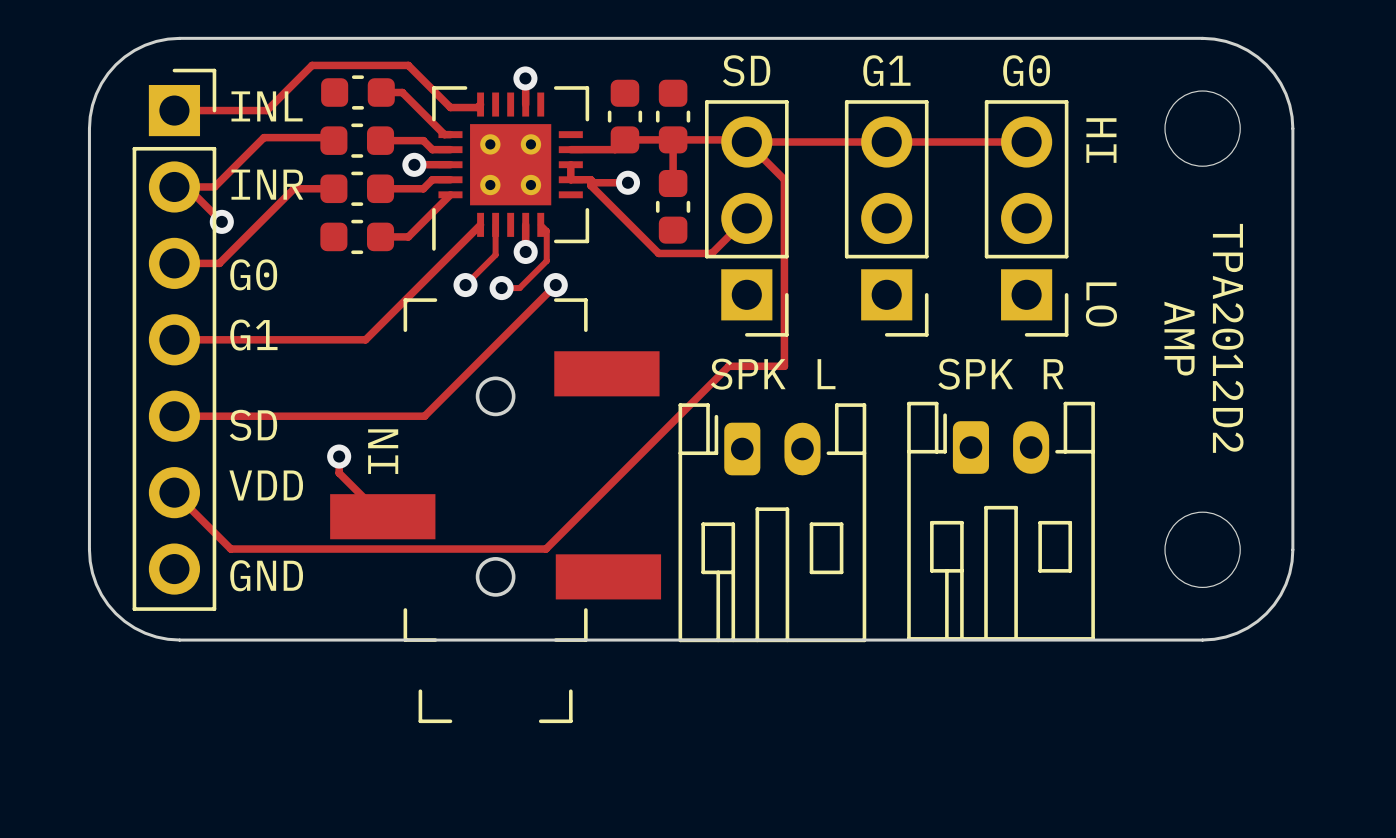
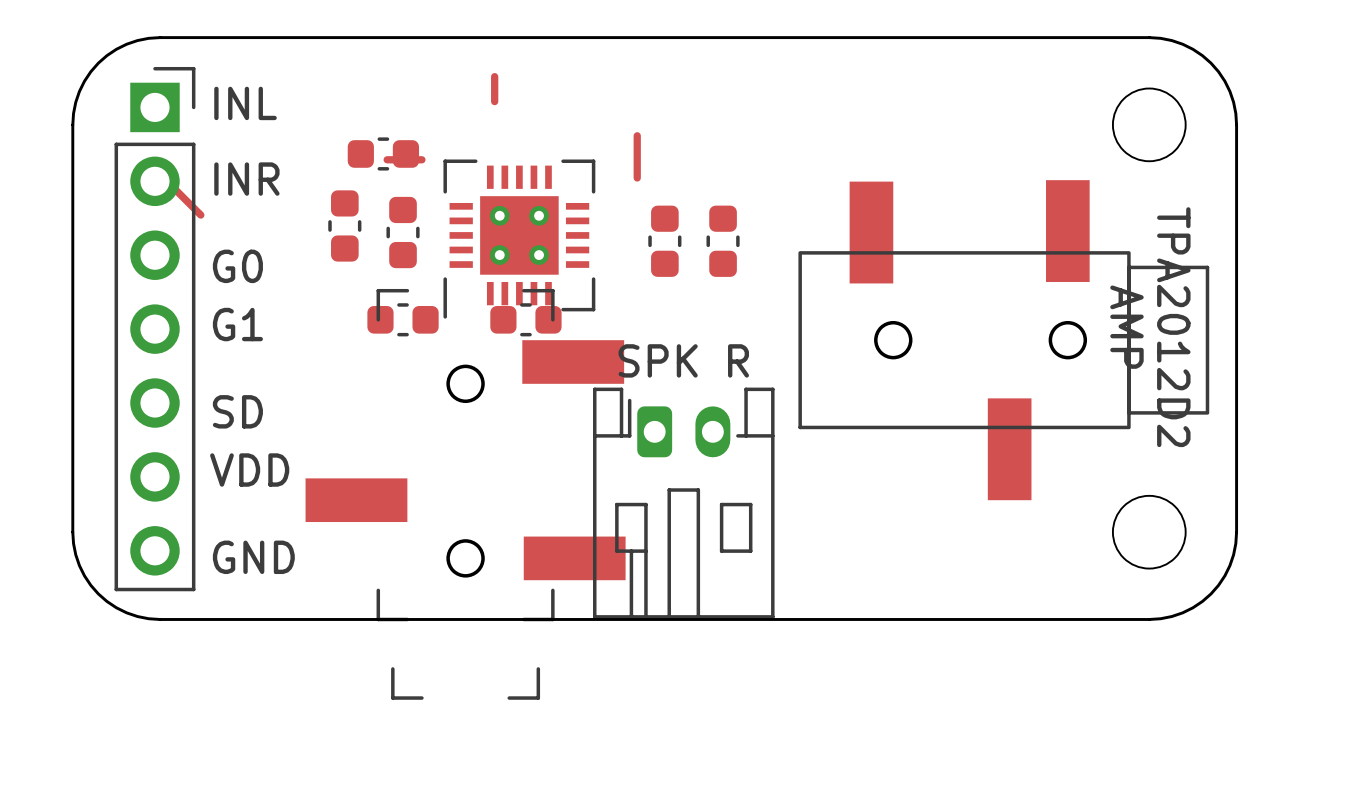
via: (525, 78) -> none
part: (357, 92) -> none
track: (381, 92) (402, 92) (444, 134) (450, 134) -> none
track: (480, 104) (477, 107) (450, 107) (408, 65) (312, 65) (266, 110) (174, 110) -> none
part: (624, 116) -> none
part: (673, 116) -> none
track: (333, 140) (330, 137) (263, 137) (214, 186) (174, 186) -> none
part: (357, 140) -> none
track: (380, 140) (423, 140) (432, 149) (450, 149) -> none
text: HI (1101, 140) -> none
track: (746, 141) (1026, 141) -> none
track: (570, 149) (615, 149) (624, 139) (744, 139) (784, 179) (784, 366) (728, 366) (546, 549) (230, 549) (174, 492) -> none
part: none -> (383, 153)
via: (414, 164) -> none
track: (570, 164) (570, 179) (590, 179) -> none
part position: (510, 168) -> (519, 239)
track: (450, 179) (432, 179) (423, 188) (380, 188) -> none
track: (590, 179) (593, 182) (627, 182) -> none
track: (590, 179) (590, 185) (658, 253) (711, 253) (746, 218) -> none
via: (627, 182) -> none
track: (333, 188) (294, 188) (219, 263) (174, 263) -> none
part: (357, 188) -> none
track: (450, 194) (408, 236) (380, 236) -> none
part: (673, 206) -> none
part: SD (746, 218) -> none
part: G1 (886, 218) -> none
part: G0 (1026, 218) -> none
via: (221, 221) -> none
track: (480, 224) (365, 339) (174, 339) -> none
track: (495, 224) (495, 254) (465, 285) -> none
track: (540, 224) (546, 230) (546, 260) (519, 288) (501, 288) -> none
part rotation: 0° (357, 236) -> 90° clockwise (344, 225)
part: none -> (403, 232)
part: none -> (664, 241)
part: none -> (723, 241)
via: (525, 251) -> none
via: (465, 285) -> none
track: (555, 285) (424, 416) (174, 416) -> none
via: (555, 285) -> none
via: (501, 288) -> none
text: LO (1101, 304) -> none
part: none -> (403, 319)
part: none -> (525, 319)
part: none -> (1003, 340)
text: IN (383, 451) -> none
track: (339, 456) (339, 473) (382, 516) -> none
via: (339, 456) -> none
part position: (1001, 521) -> (683, 503)
part: SPK L (772, 522) -> none

